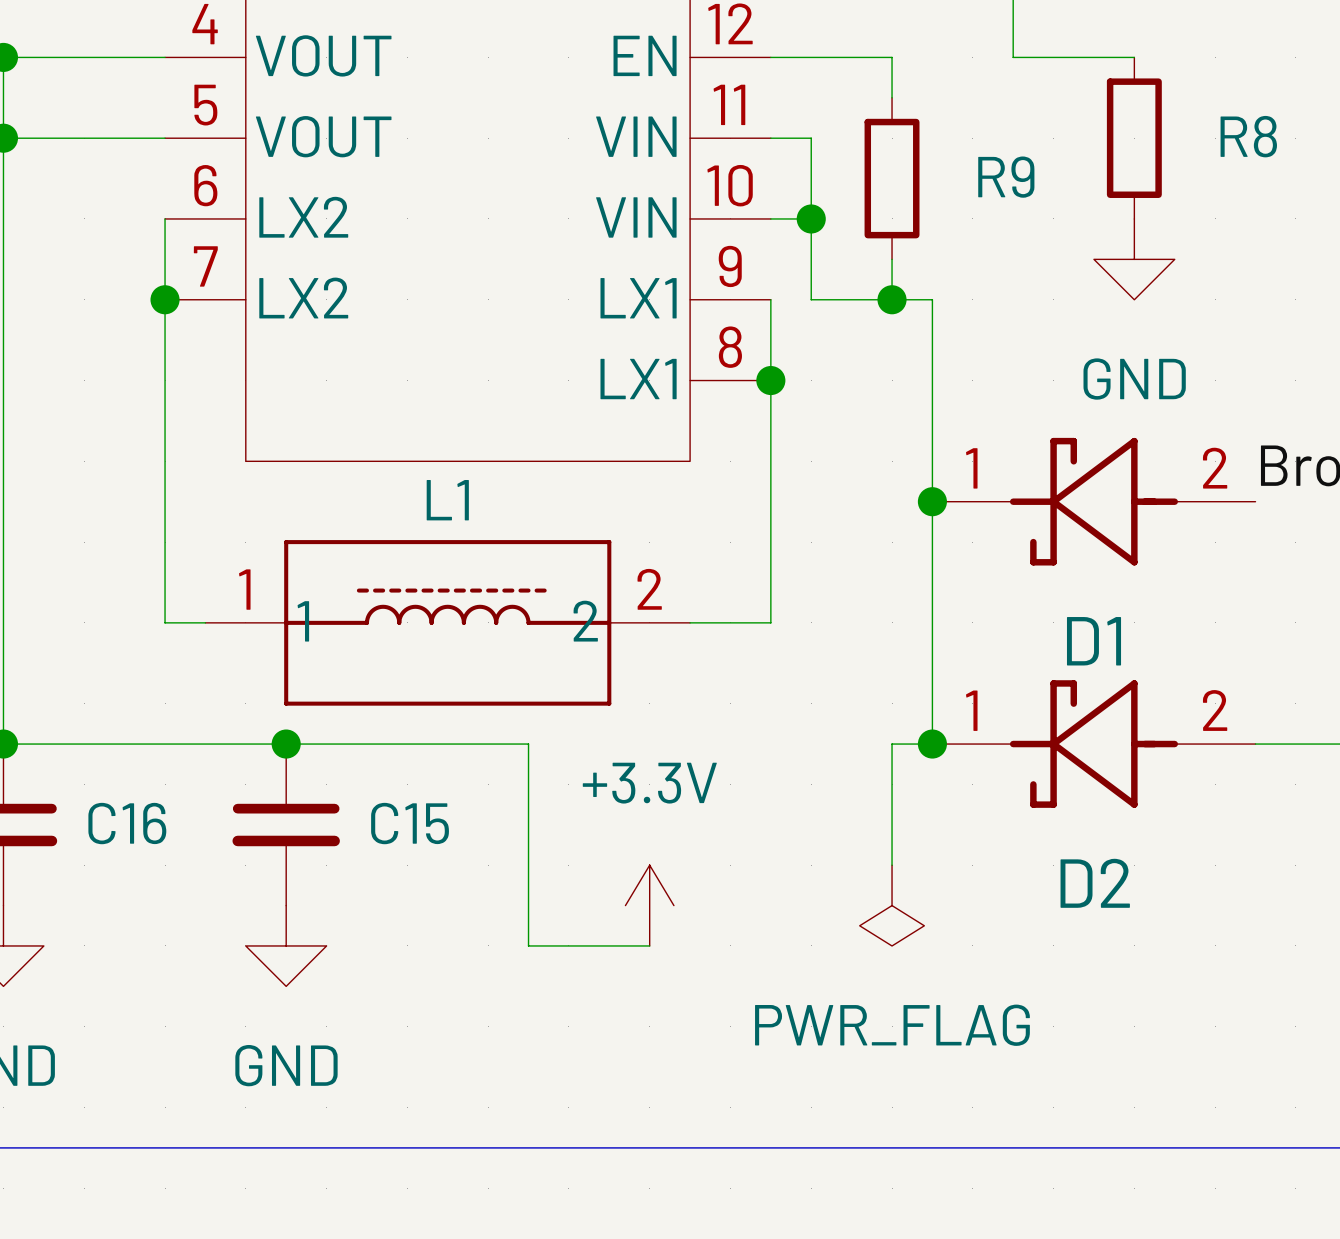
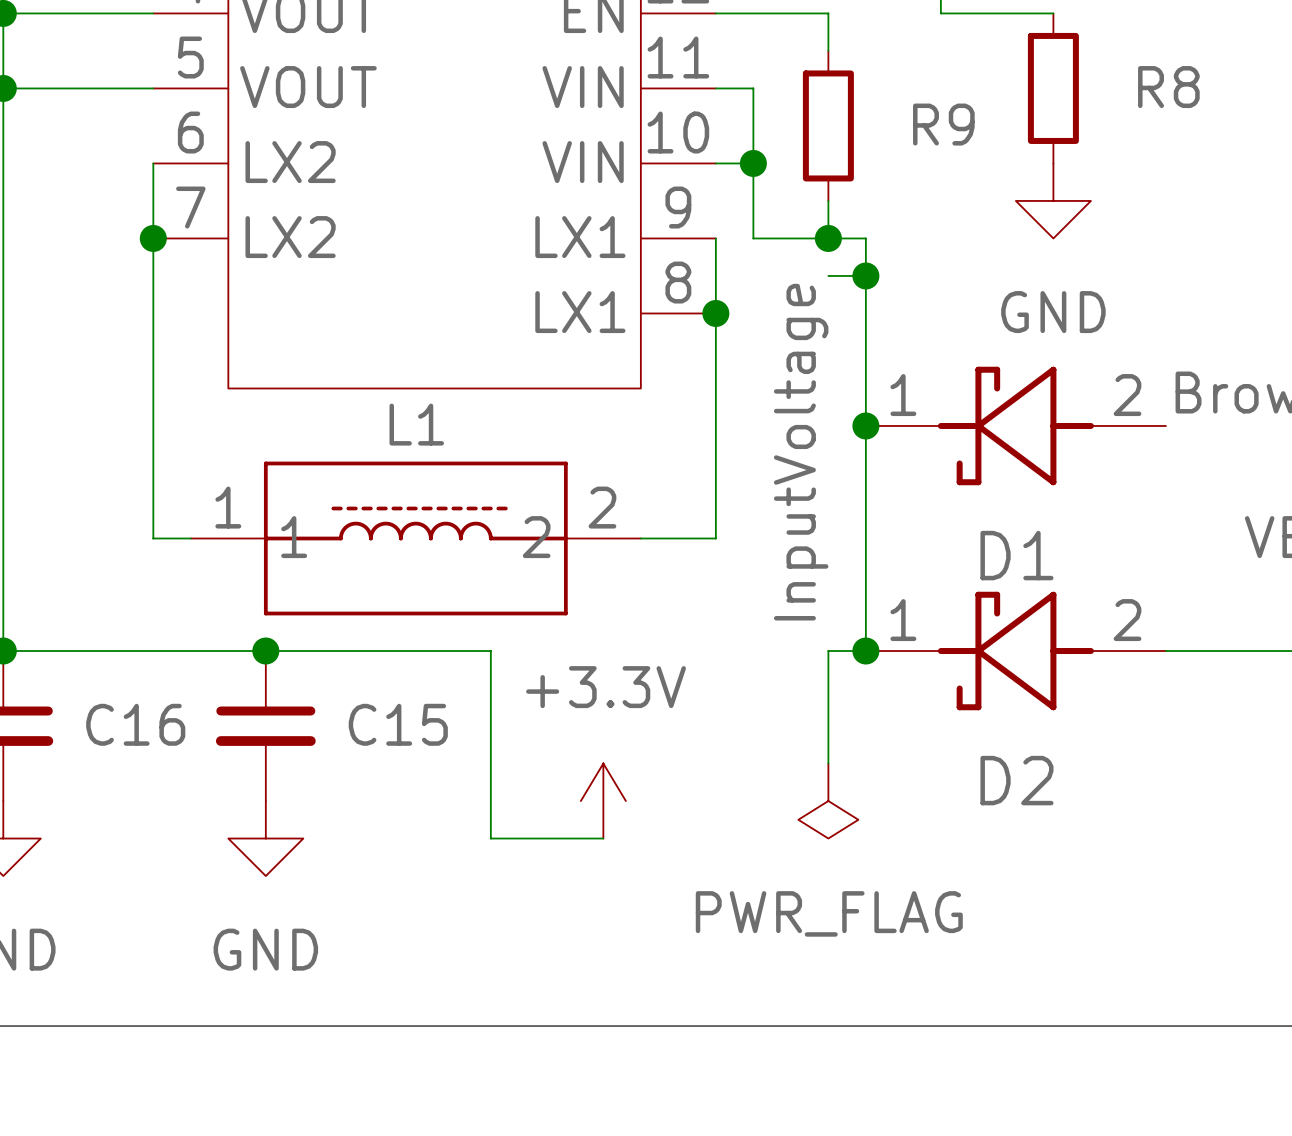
wire: none -> (828, 275) (865, 275)
junction: none -> (865, 275)
label: none -> InputVoltage (801, 452)

